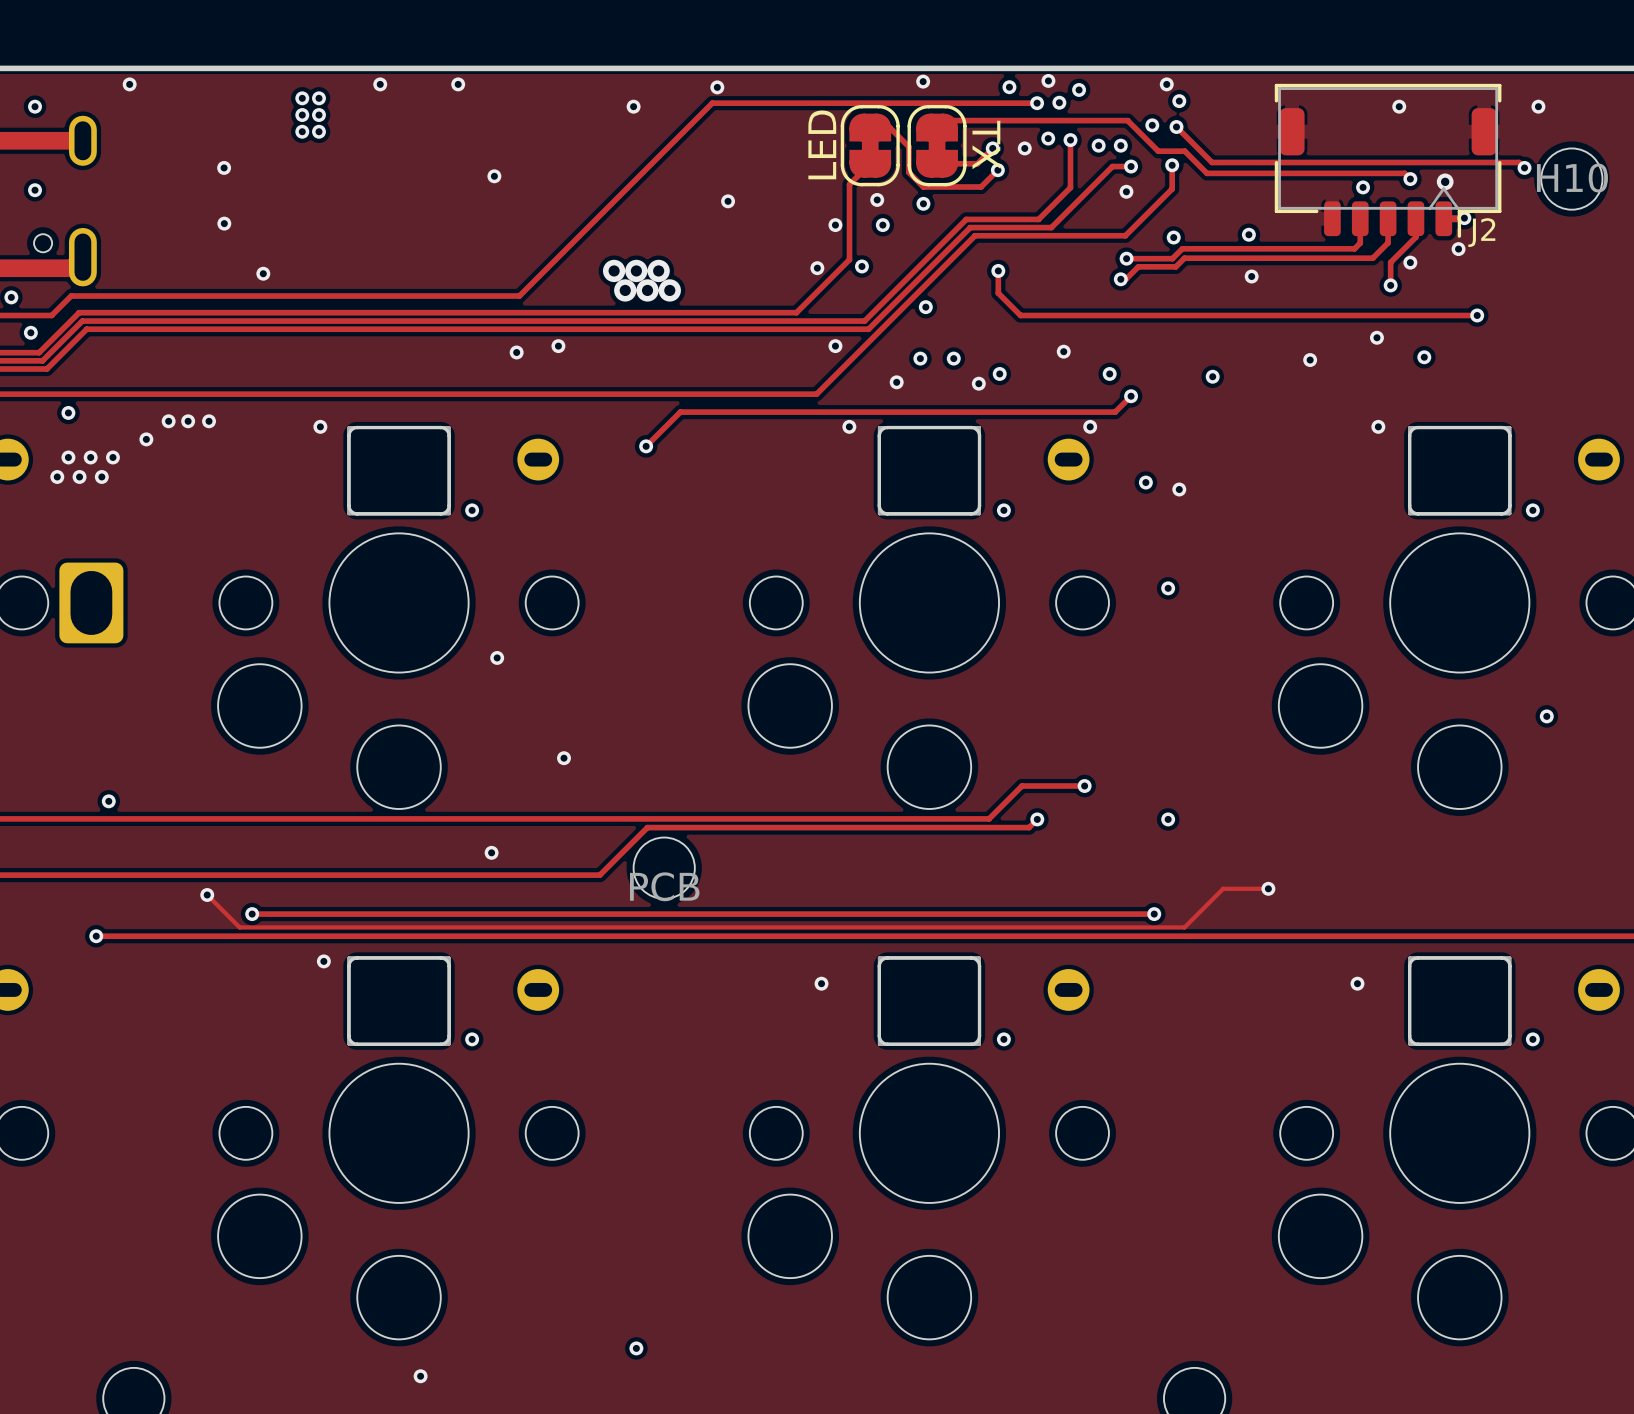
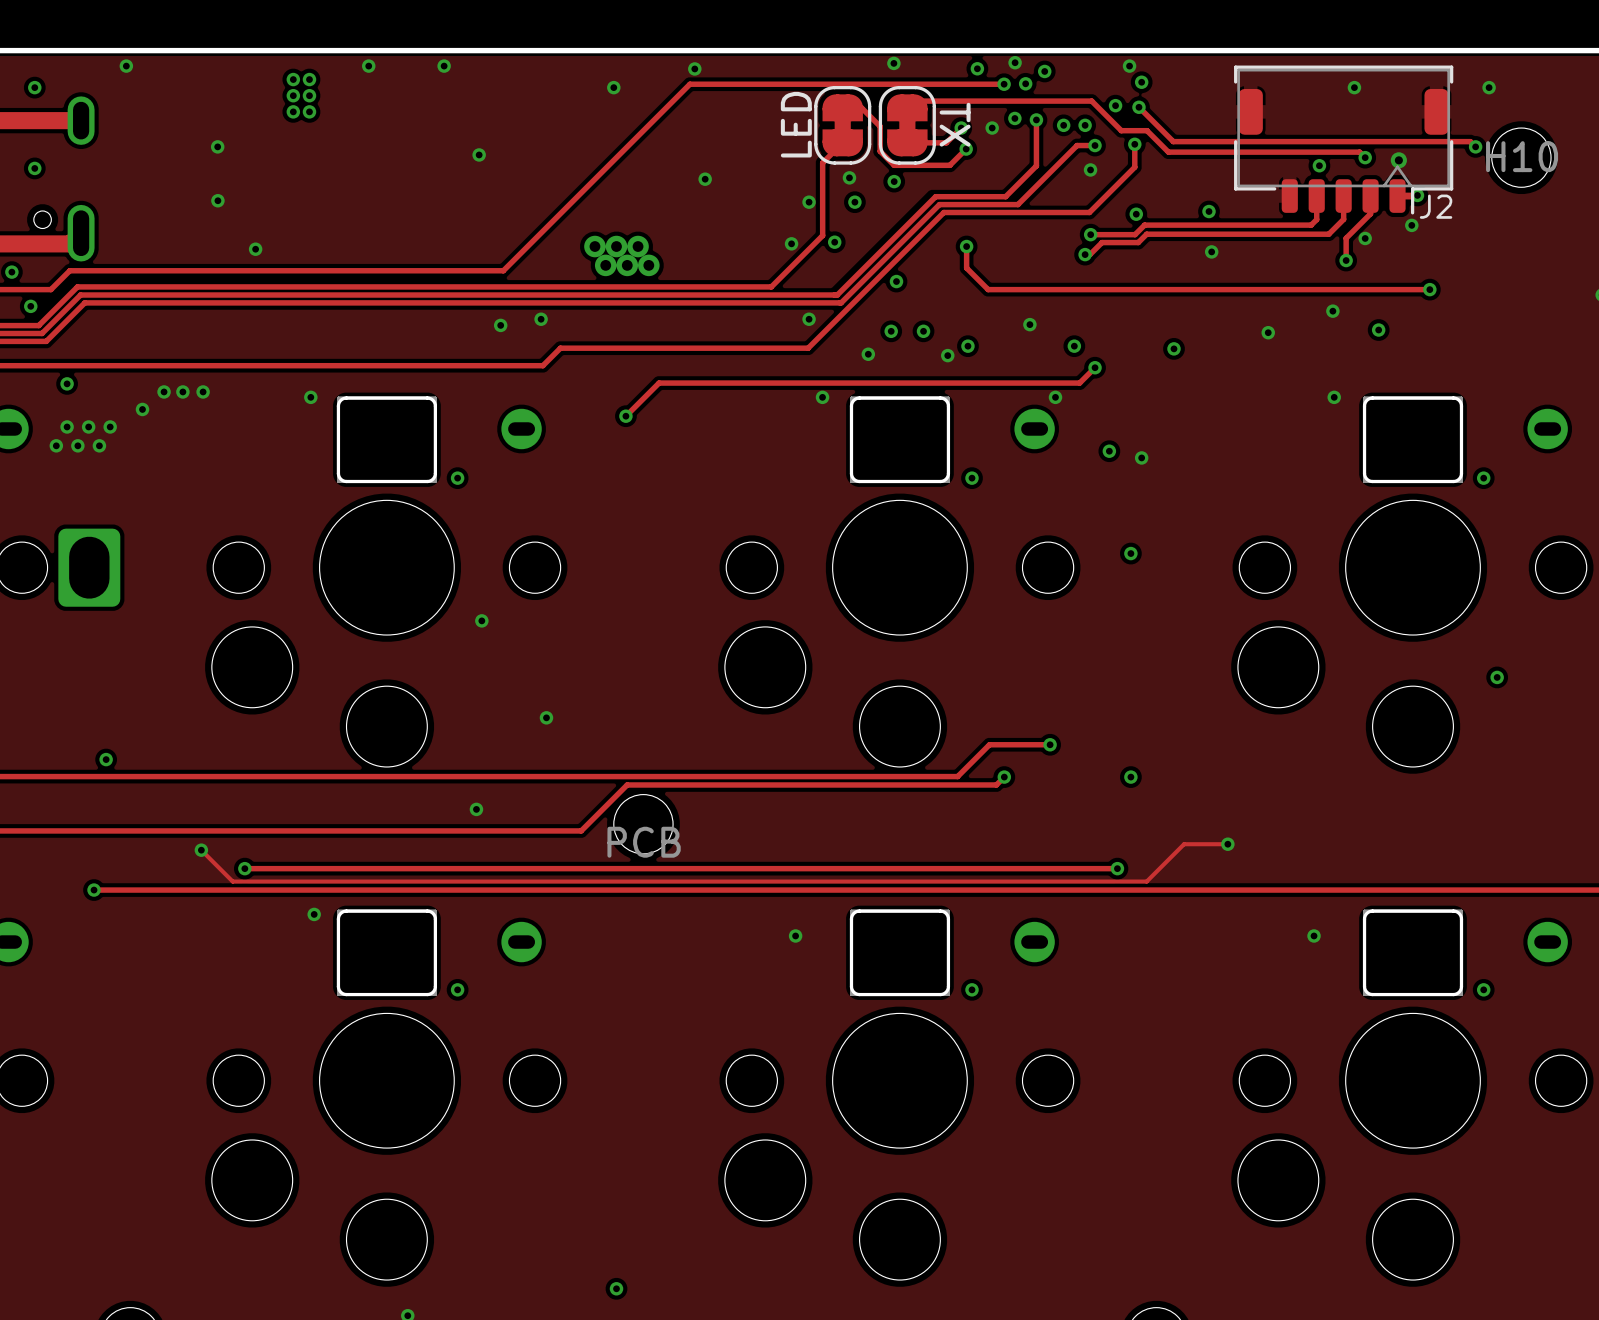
track: (975, 235) (816, 394) (560, 394) -> (943, 212) (808, 348) (560, 348) (542, 365)

